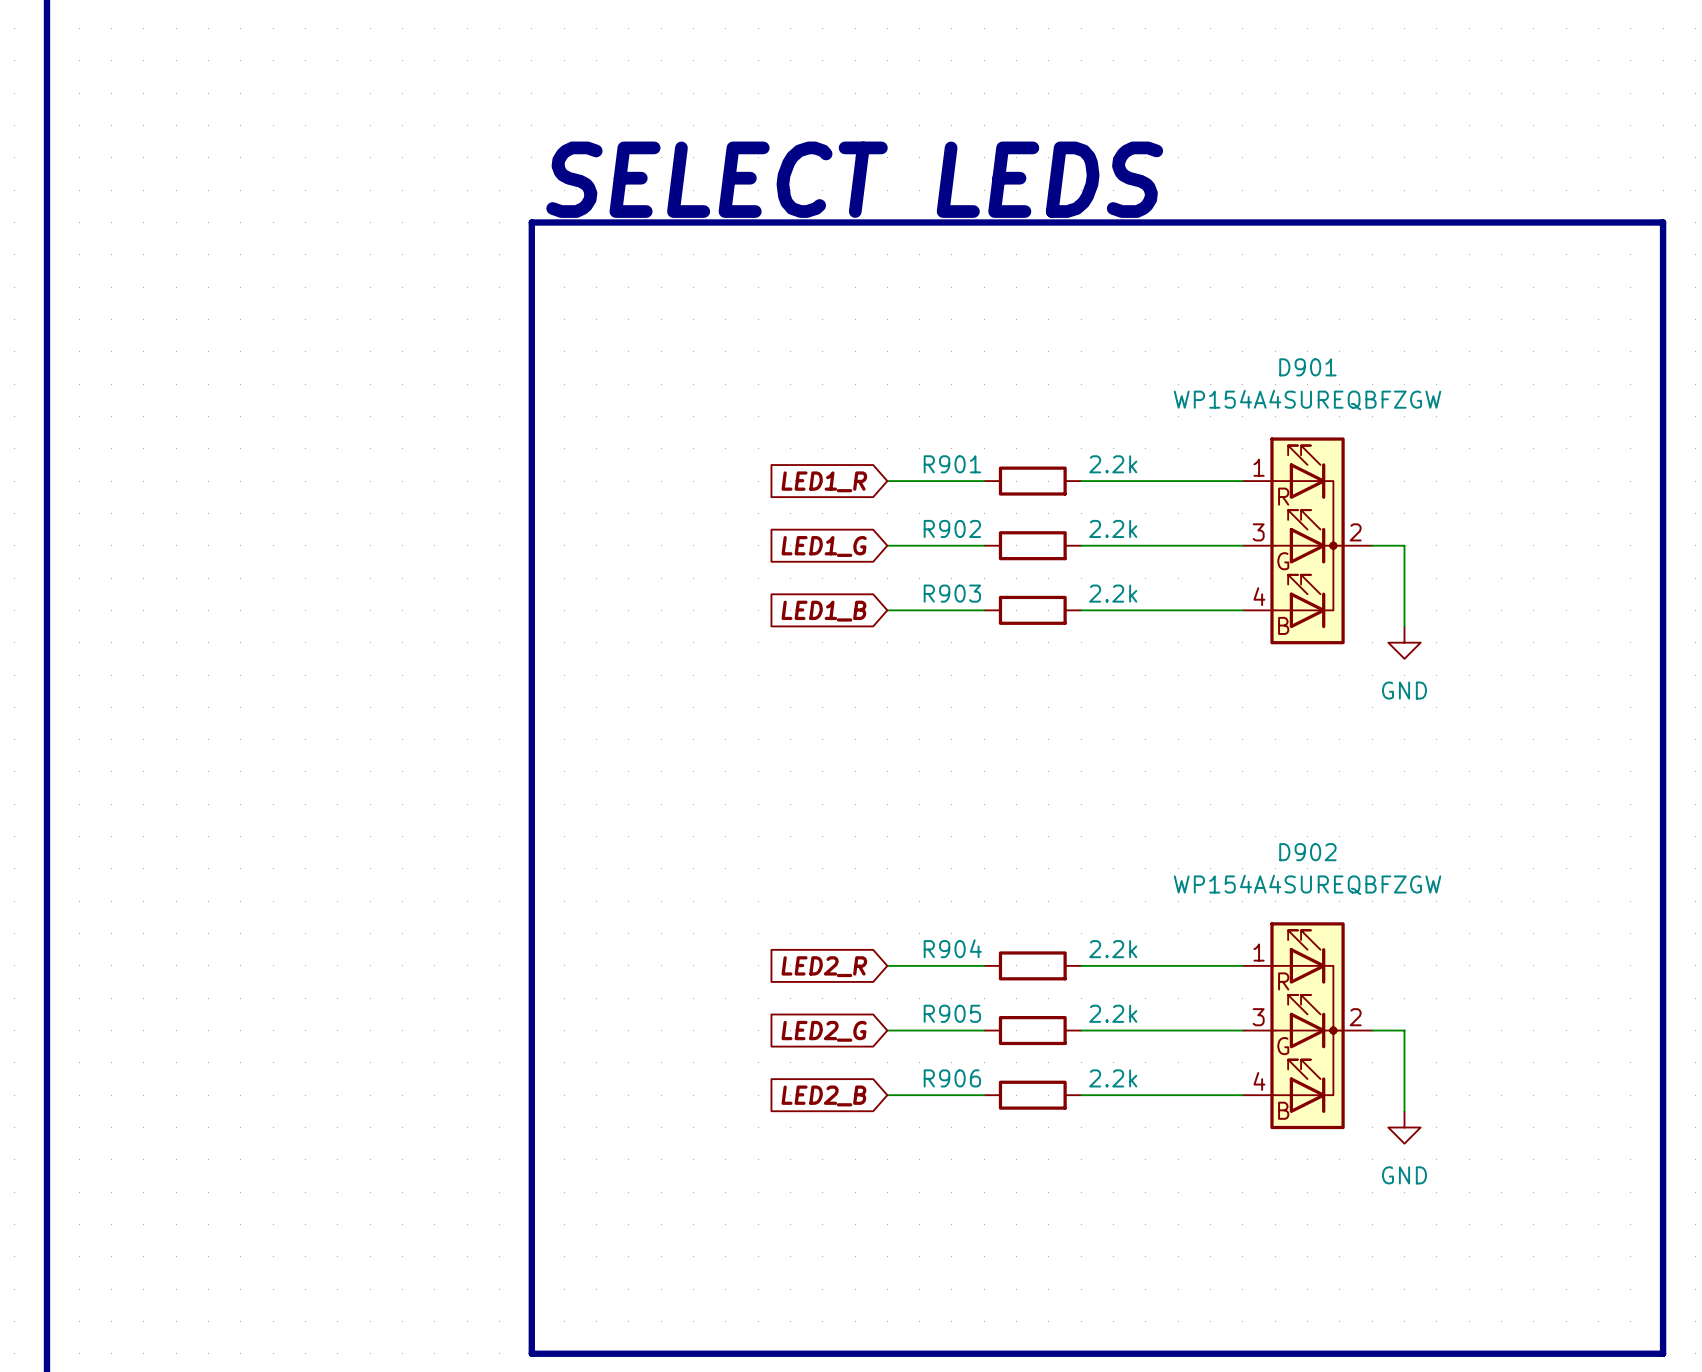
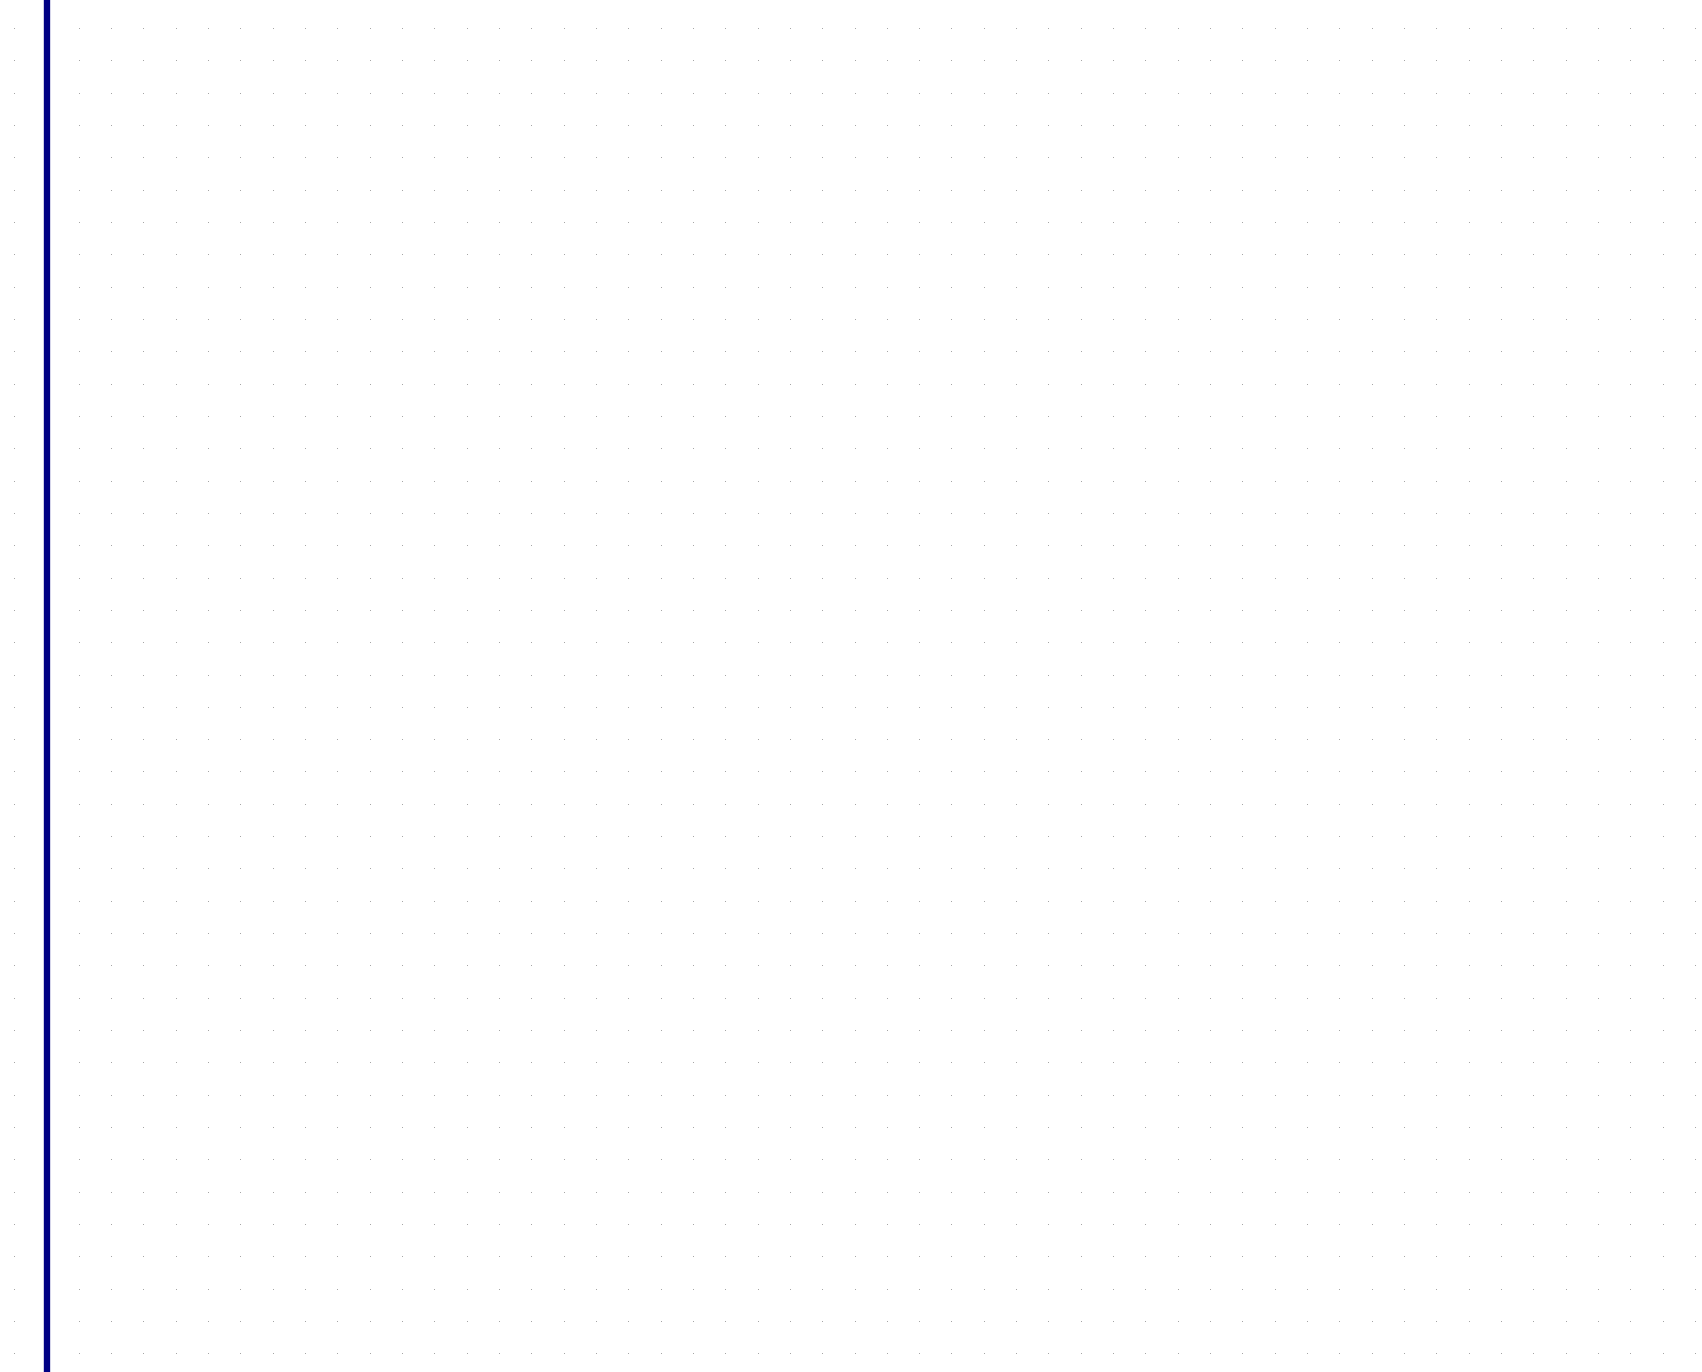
text: SELECT LEDS (854, 179) -> none
line: (531, 222) (531, 1353) (1663, 1353) (1663, 222) (531, 222) -> none
global label: LED1_R (824, 481) -> none
wire: (887, 481) (984, 481) -> none
R901: 2.2k (1032, 481) -> none
wire: (1081, 481) (1242, 481) -> none
D901: WP154A4SUREQBFZGW (1307, 540) -> none
wire: (887, 545) (984, 545) -> none
R902: 2.2k (1032, 545) -> none
wire: (1081, 545) (1242, 545) -> none
wire: (1372, 545) (1404, 545) (1404, 626) -> none
global label: LED1_G (824, 546) -> none
wire: (887, 610) (984, 610) -> none
R903: 2.2k (1032, 610) -> none
wire: (1081, 610) (1242, 610) -> none
global label: LED1_B (823, 611) -> none
power symbol: GND (1404, 642) -> none
wire: (887, 965) (984, 965) -> none
R904: 2.2k (1032, 965) -> none
wire: (1081, 965) (1242, 965) -> none
global label: LED2_R (824, 966) -> none
D902: WP154A4SUREQBFZGW (1307, 1025) -> none
wire: (887, 1030) (984, 1030) -> none
R905: 2.2k (1032, 1030) -> none
wire: (1081, 1030) (1242, 1030) -> none
wire: (1372, 1030) (1404, 1030) (1404, 1111) -> none
global label: LED2_G (824, 1031) -> none
global label: LED2_B (823, 1095) -> none
wire: (887, 1095) (984, 1095) -> none
R906: 2.2k (1032, 1095) -> none
wire: (1081, 1095) (1242, 1095) -> none
power symbol: GND (1404, 1127) -> none

